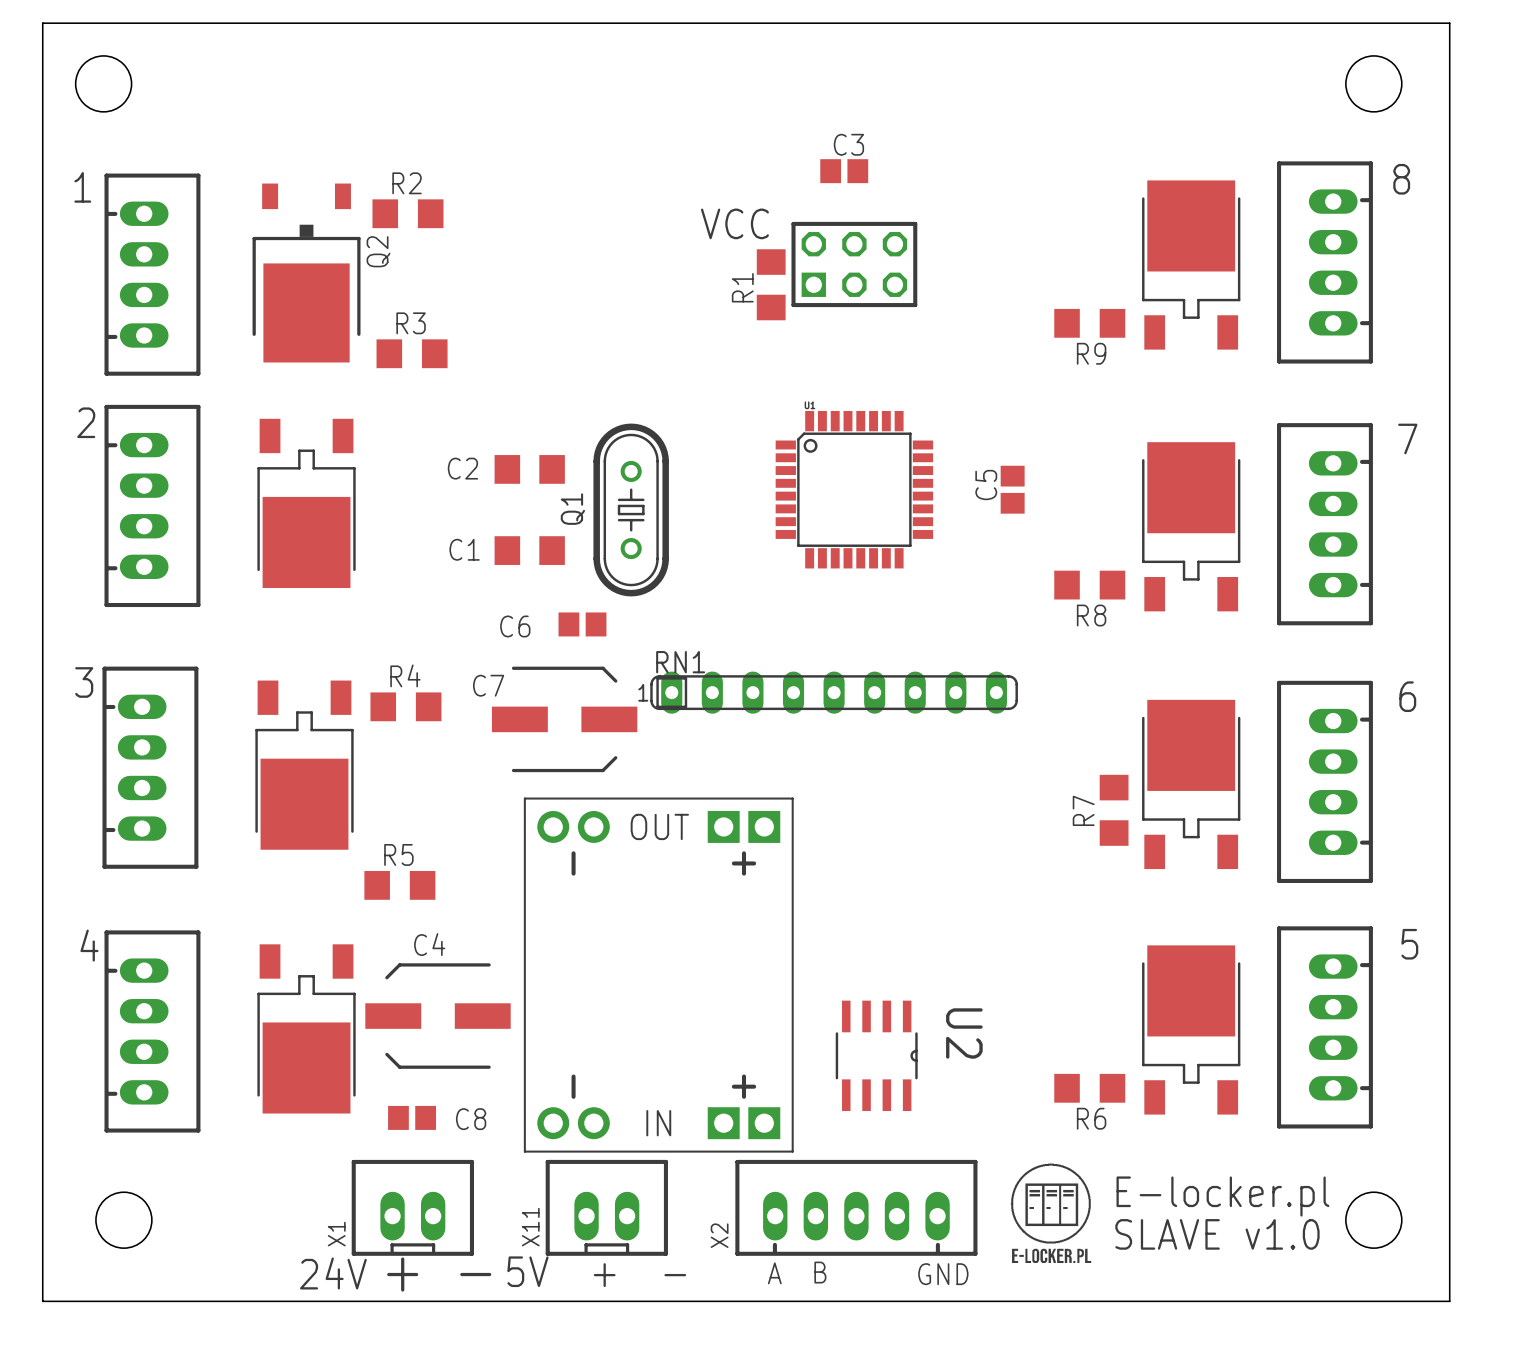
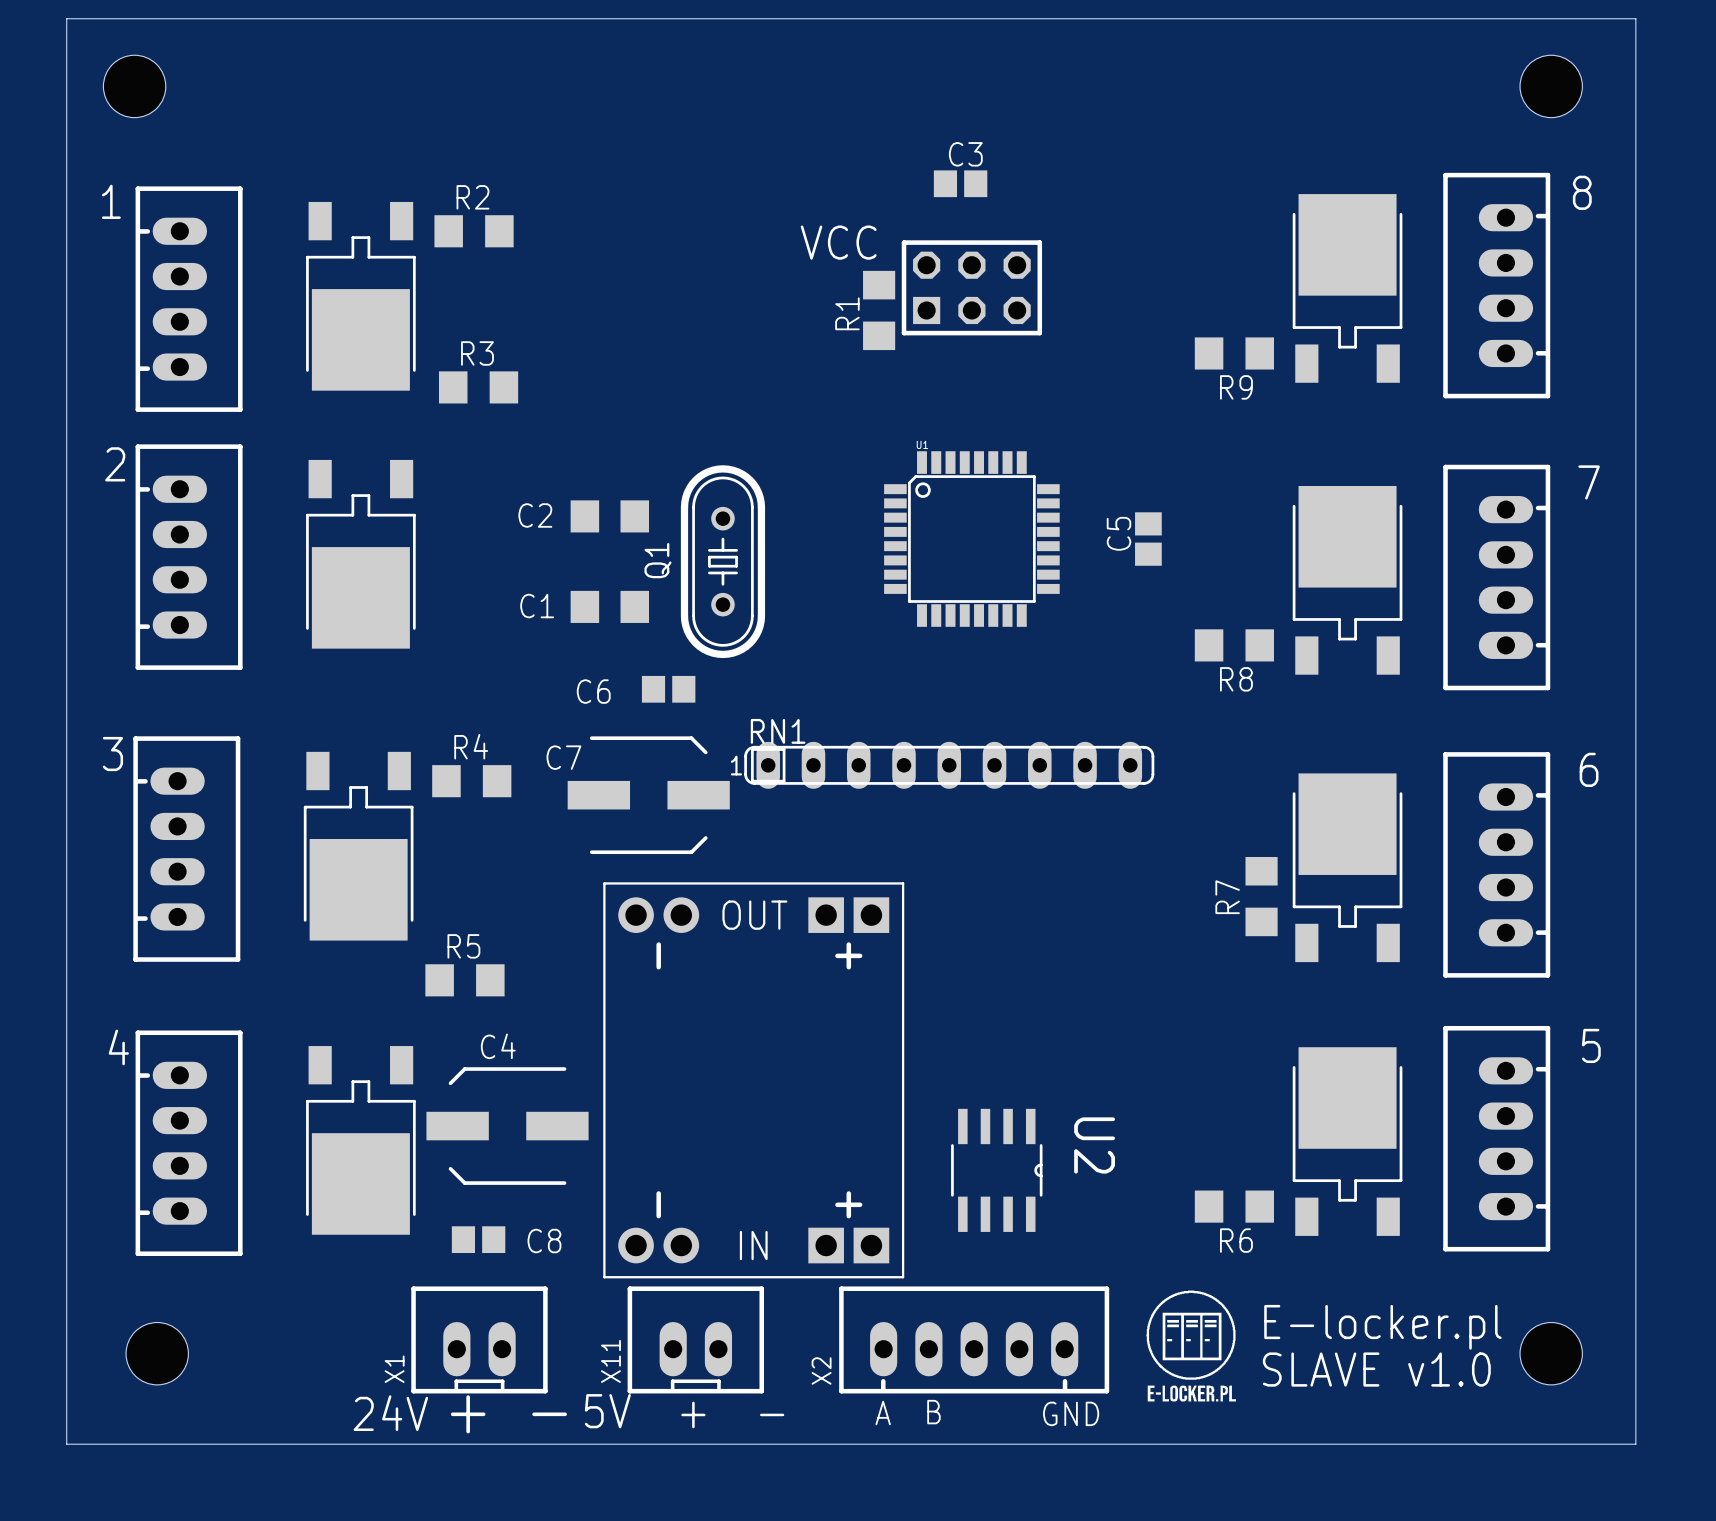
part: none -> (360, 296)
Q2: (306, 273) -> none

